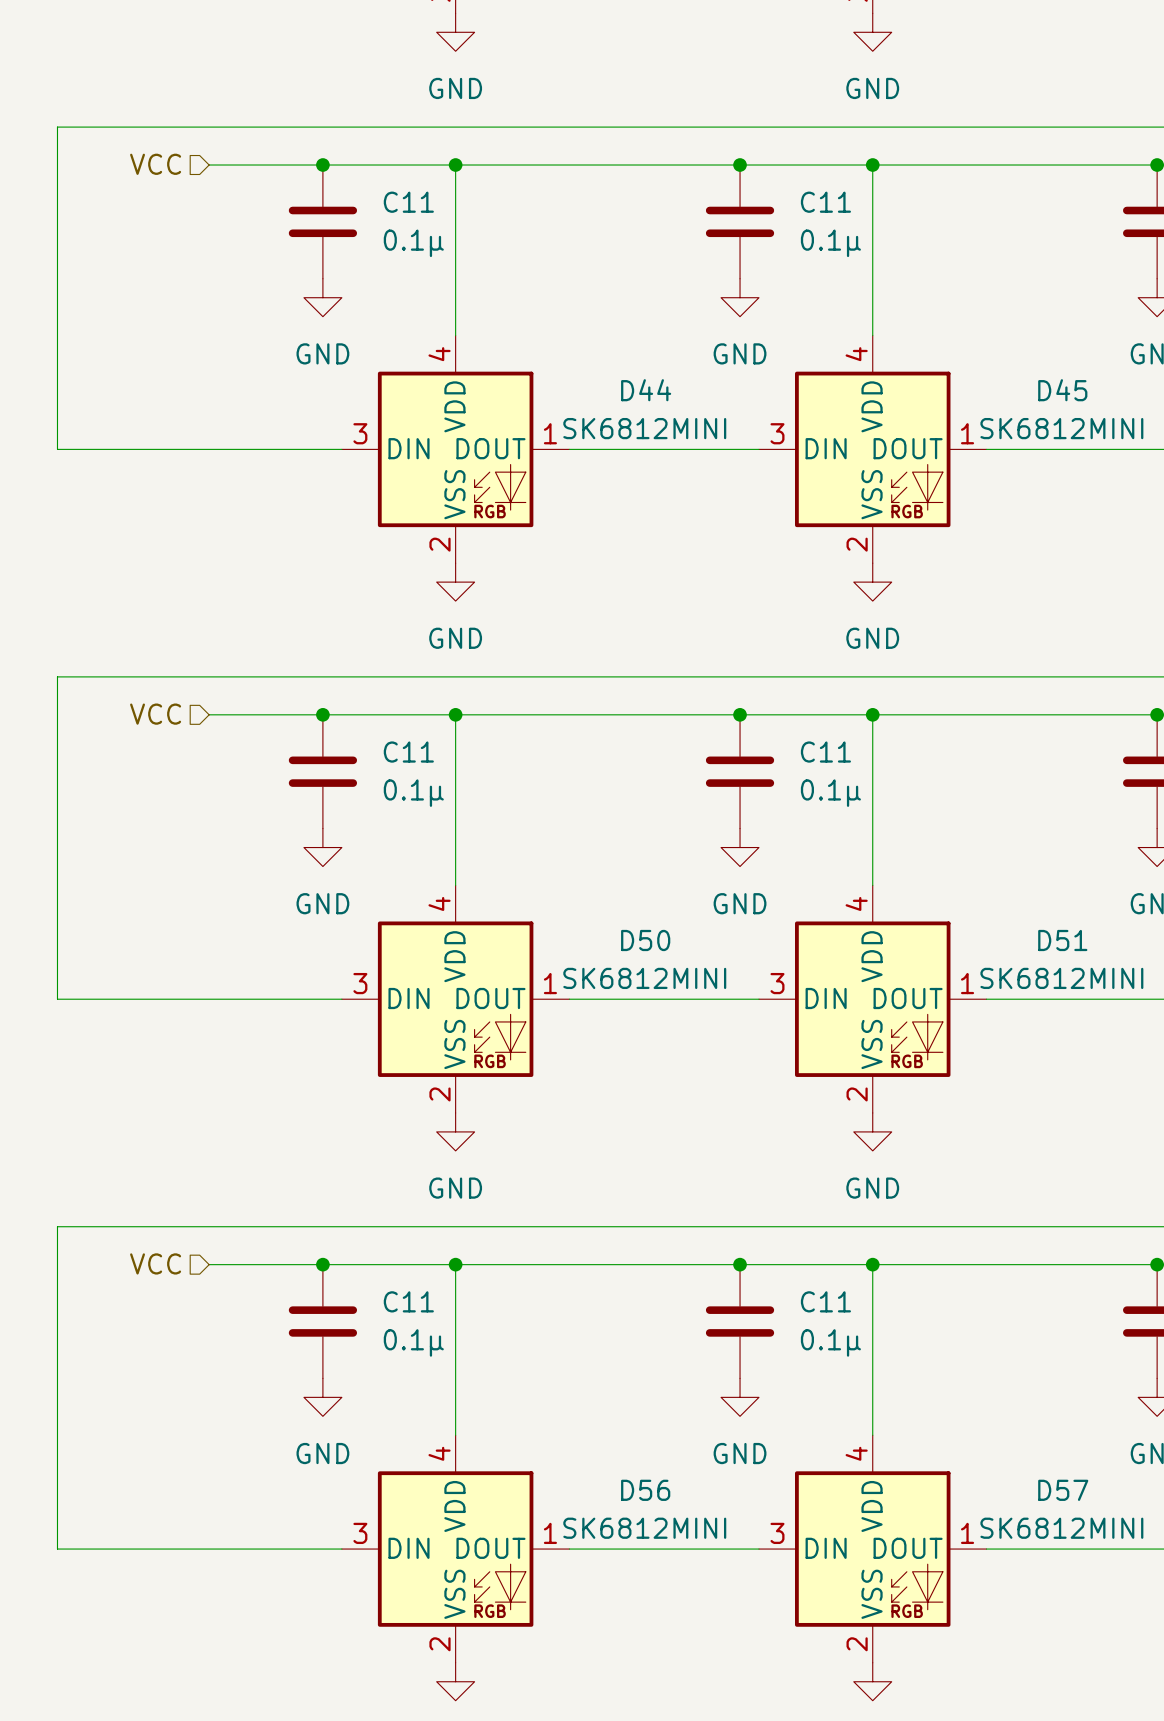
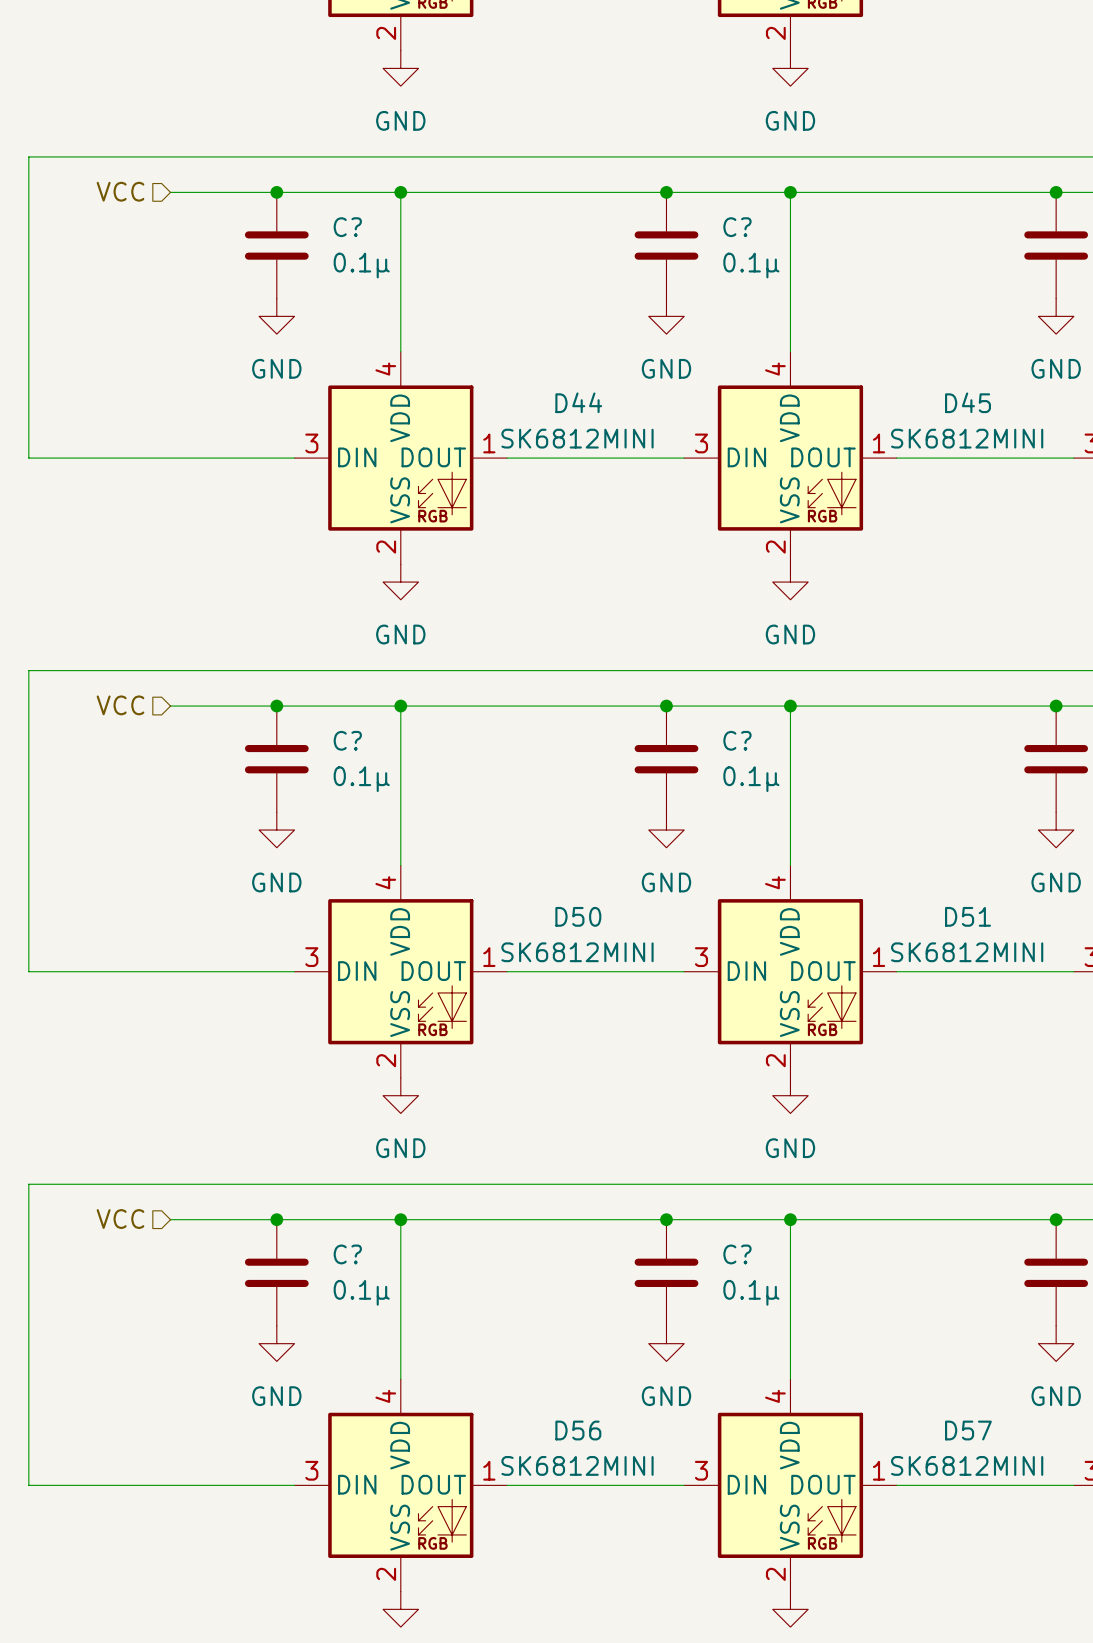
C11 name: C11 (408, 202) -> C? (347, 227)
C11 name: C11 (825, 202) -> C? (737, 227)
C11 name: C11 (408, 752) -> C? (347, 740)
C11 name: C11 (825, 752) -> C? (737, 740)
C11 name: C11 (408, 1301) -> C? (347, 1254)
C11 name: C11 (825, 1301) -> C? (737, 1254)

